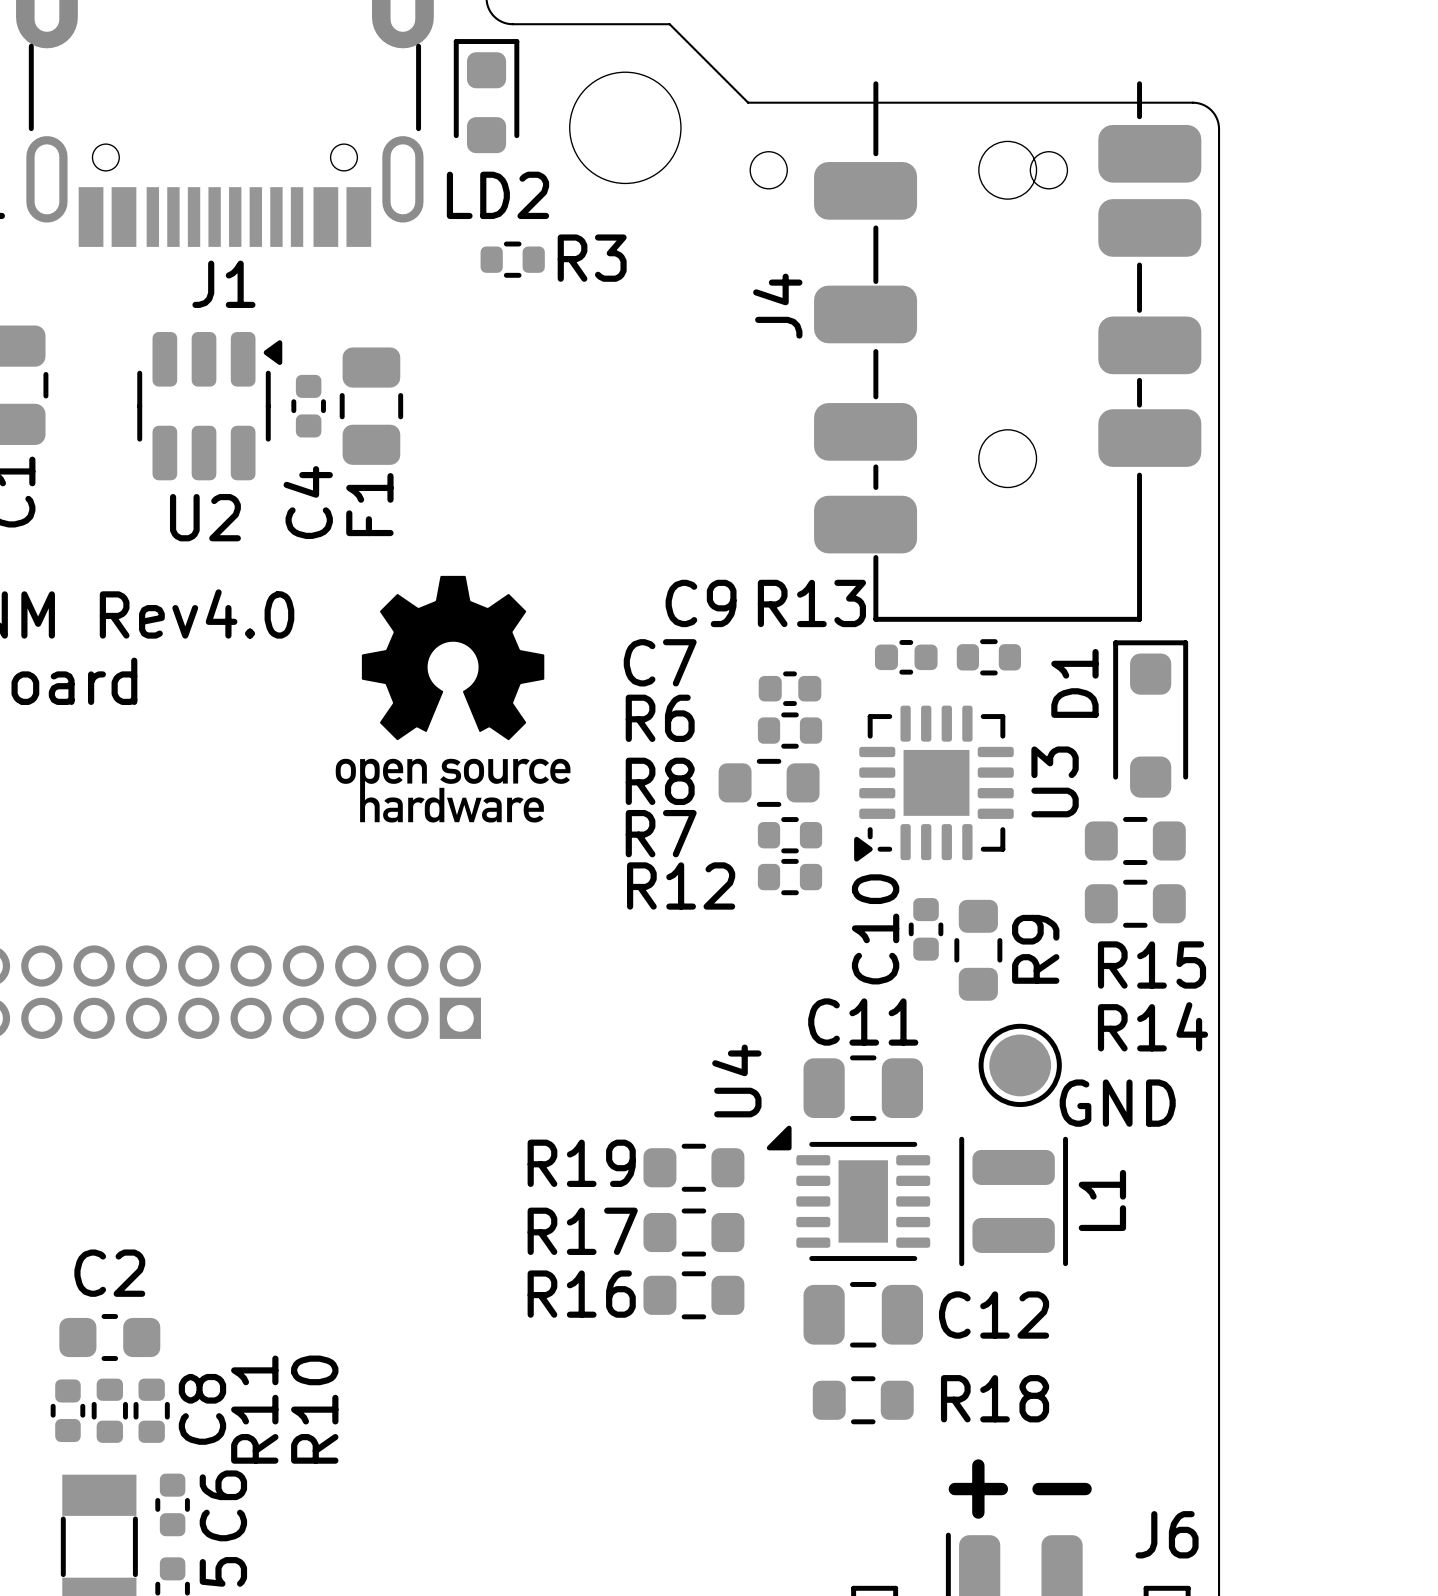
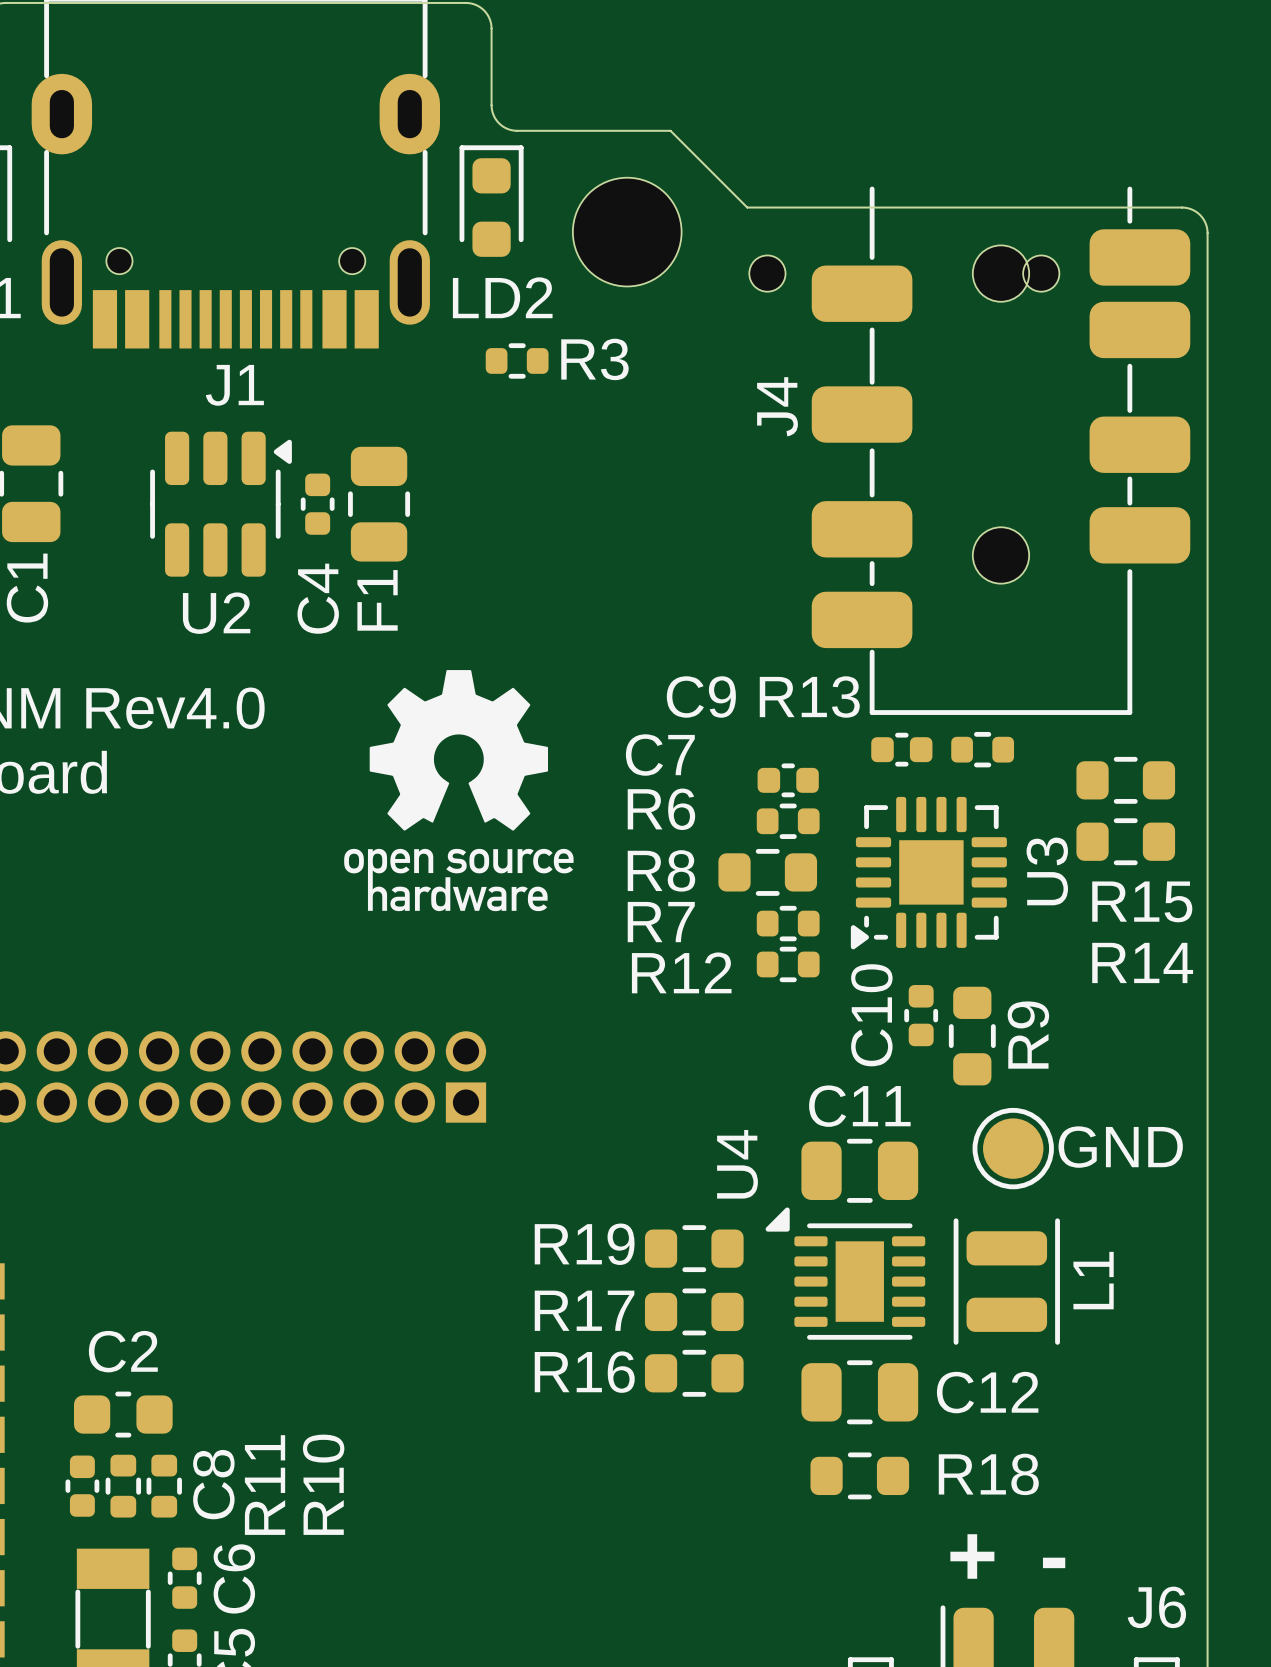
D1: (1150, 719) -> none
R15 position: (1135, 840) -> (1125, 780)
R14 position: (1135, 903) -> (1125, 841)
part value position: GND (1117, 1103) -> GND (1120, 1147)

